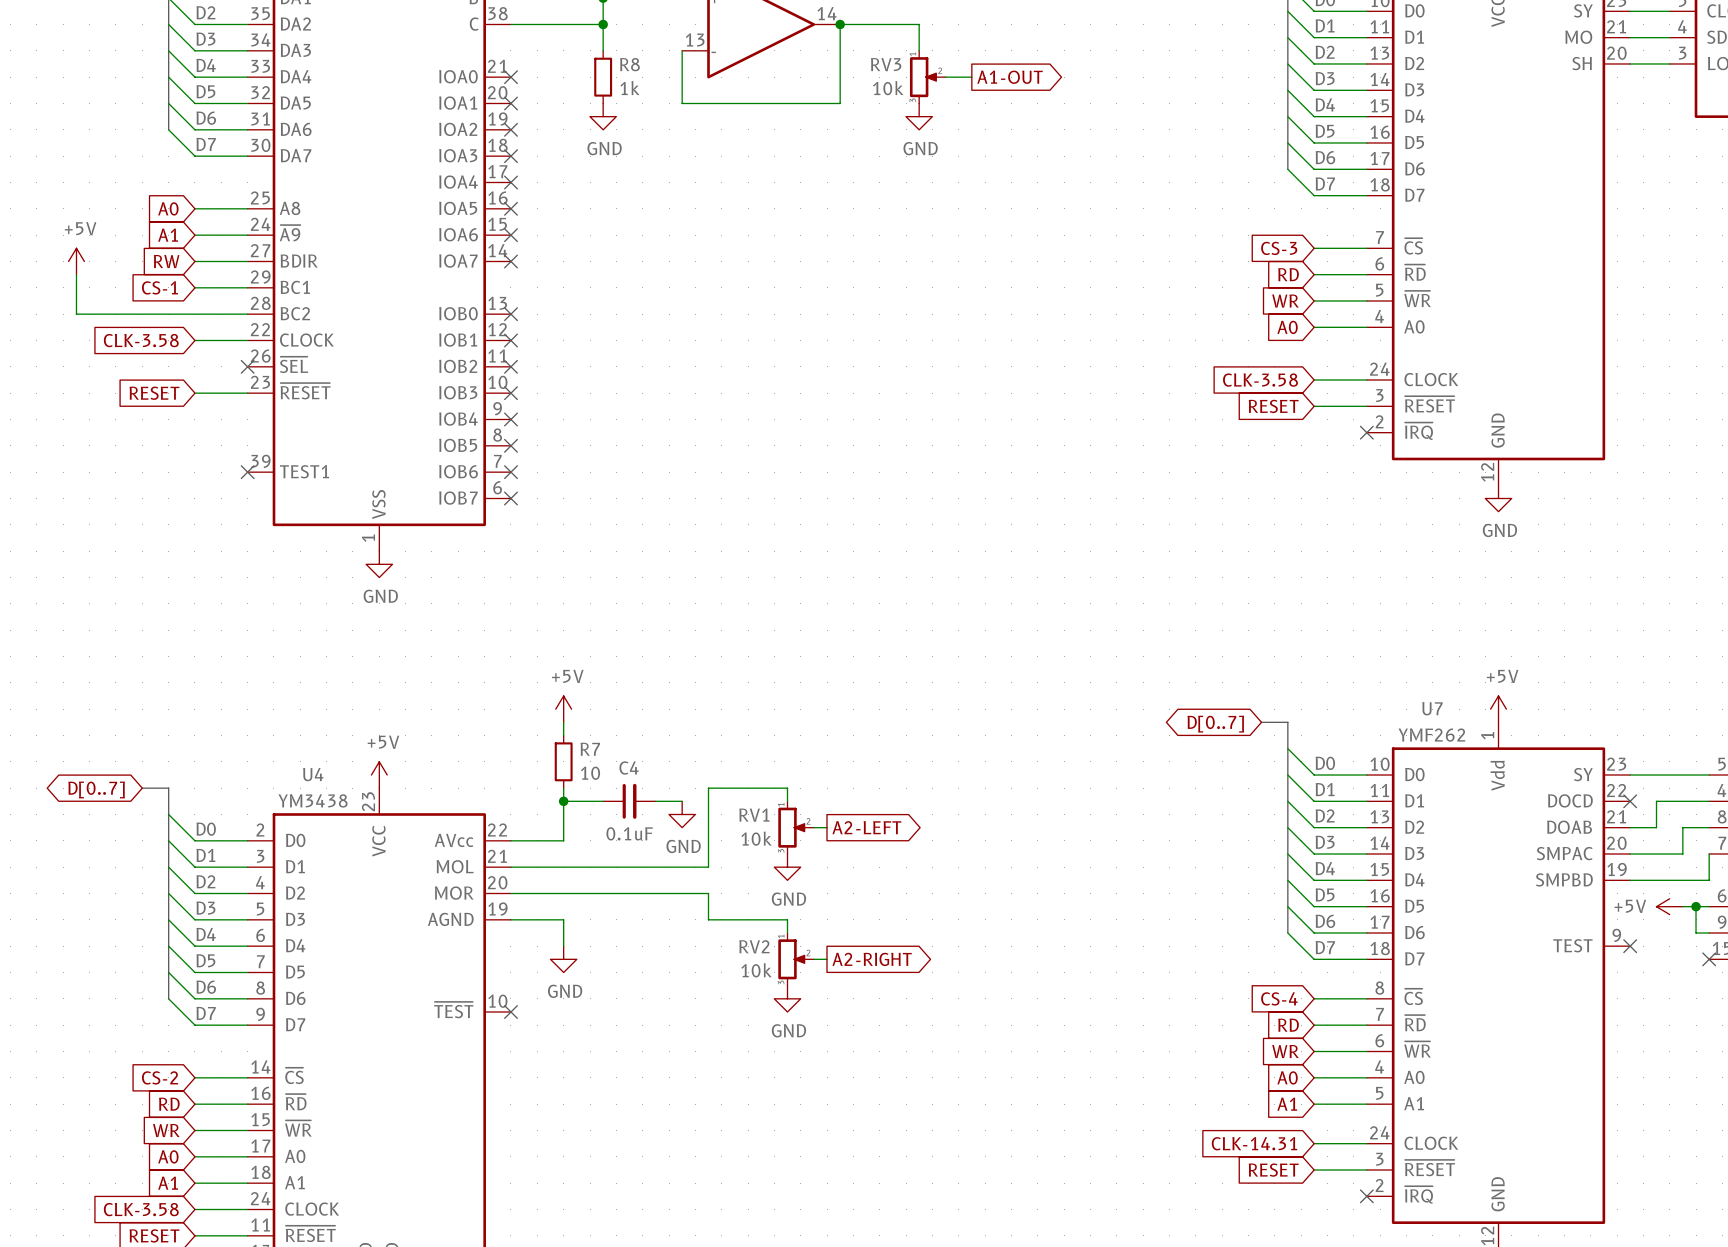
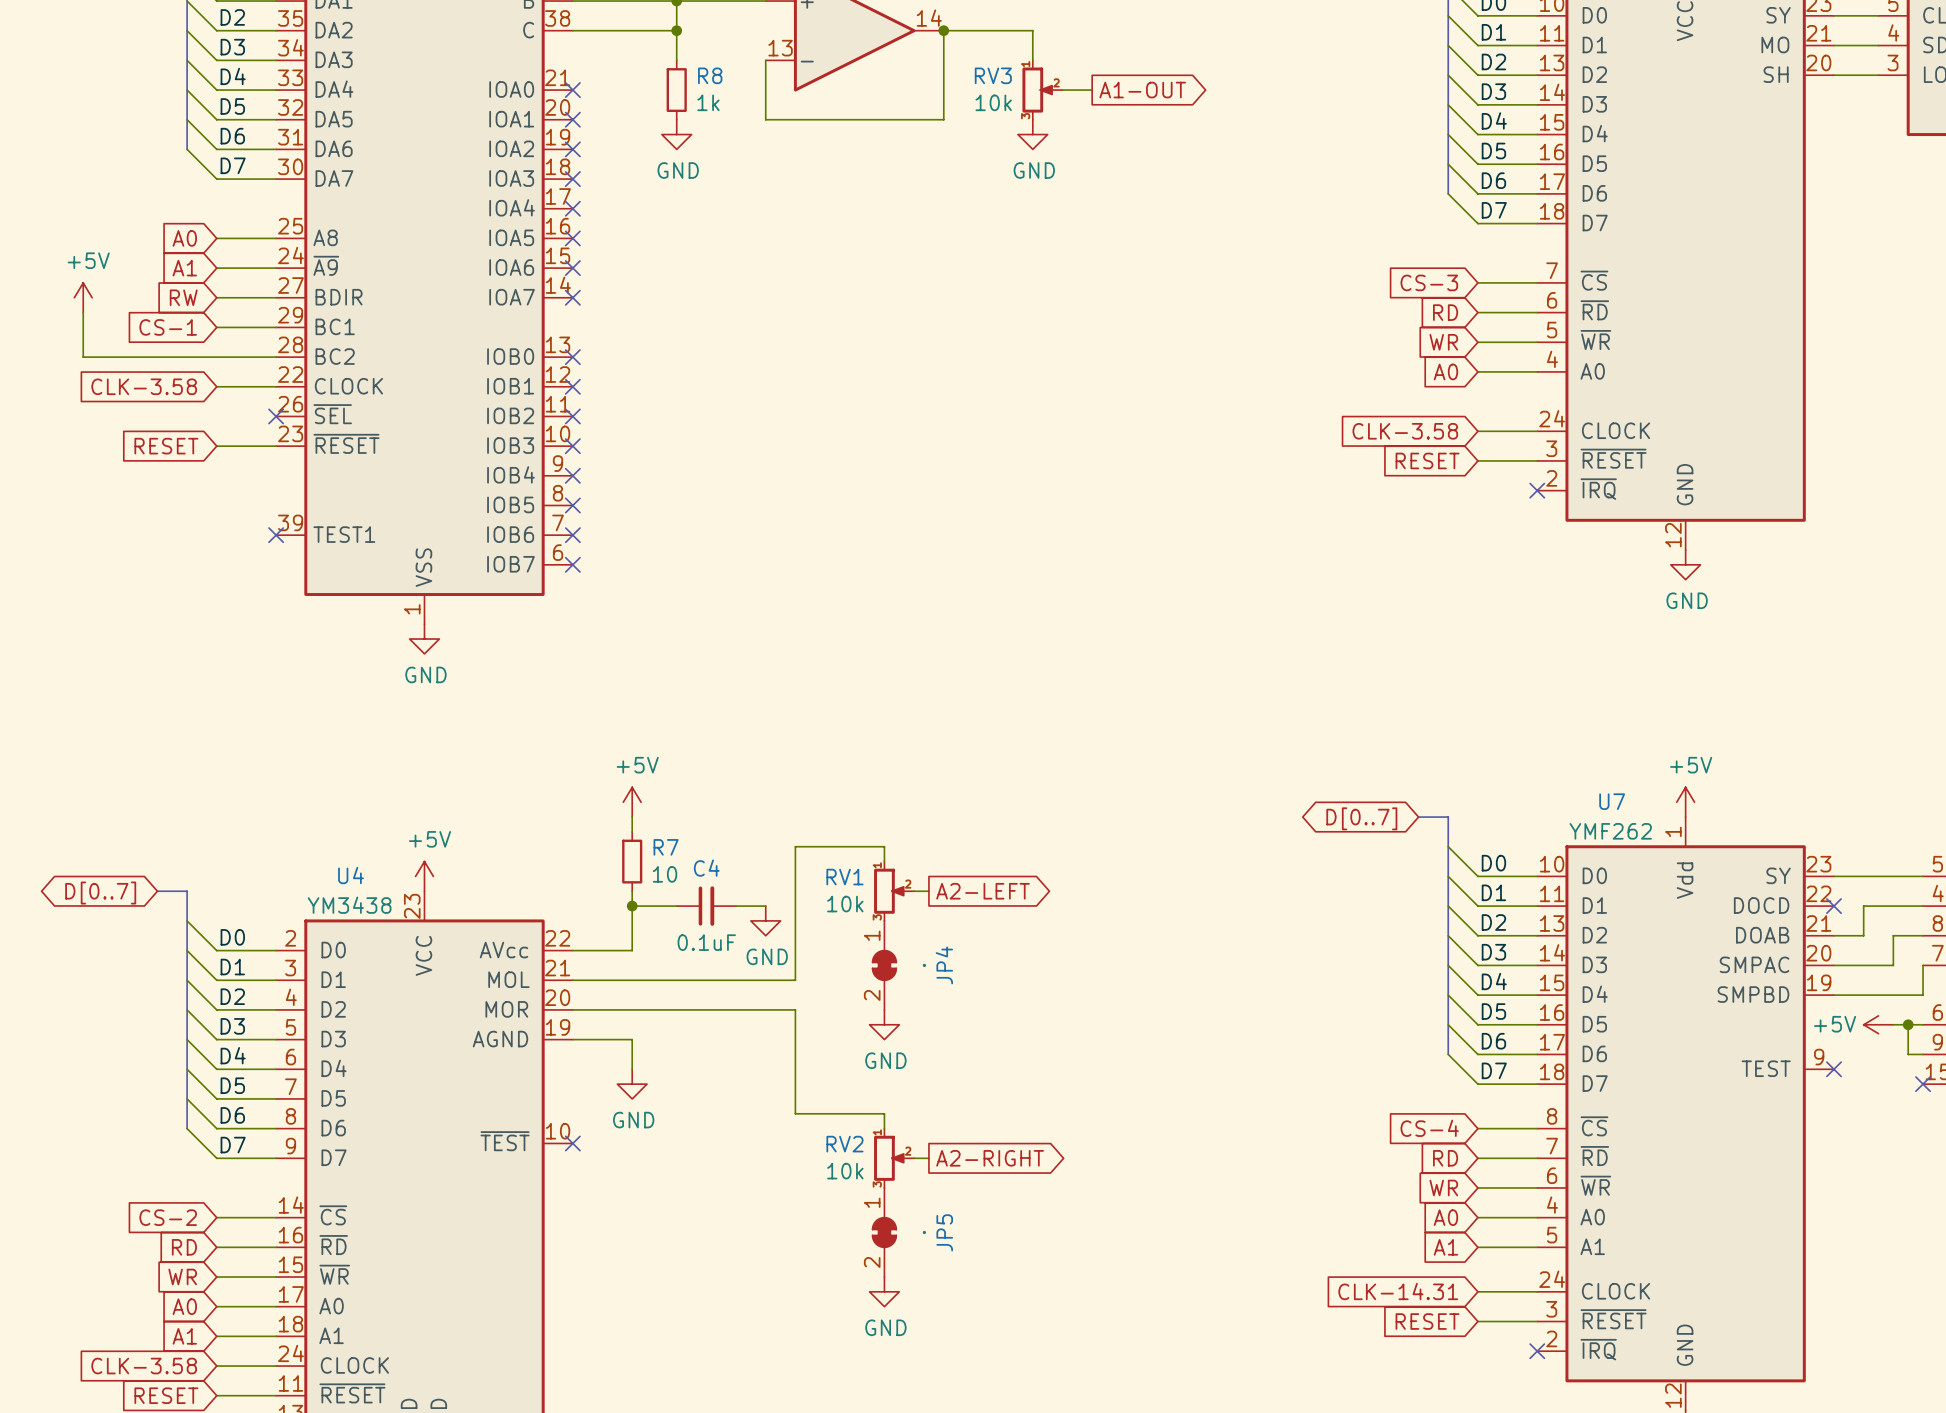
wire: (708, 788) (787, 788) (787, 801) -> (795, 891) (795, 846) (884, 846) (884, 861)
RV1 position: (796, 827) -> (894, 891)
wire: (813, 827) (827, 827) -> (914, 891) (928, 891)
global label position: A2-LEFT (866, 827) -> A2-LEFT (983, 891)
JP4: none -> . (884, 965)
power symbol position: GND (787, 867) -> GND (884, 1024)
wire: (708, 919) (787, 919) (787, 933) -> (795, 1039) (795, 1113) (884, 1113) (884, 1128)
RV2 position: (796, 959) -> (894, 1158)
wire: (813, 959) (827, 959) -> (914, 1158) (928, 1158)
global label position: A2-RIGHT (872, 959) -> A2-RIGHT (990, 1158)
power symbol: GND (787, 998) -> none
JP5: none -> . (884, 1232)
power symbol: none -> GND (884, 1291)

